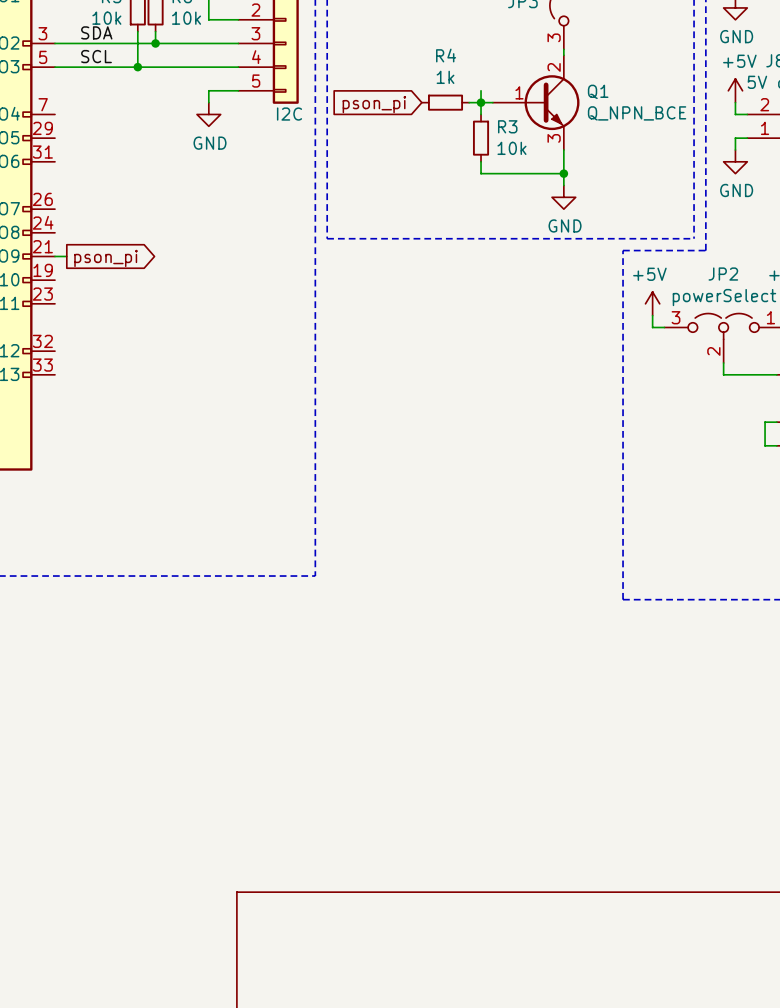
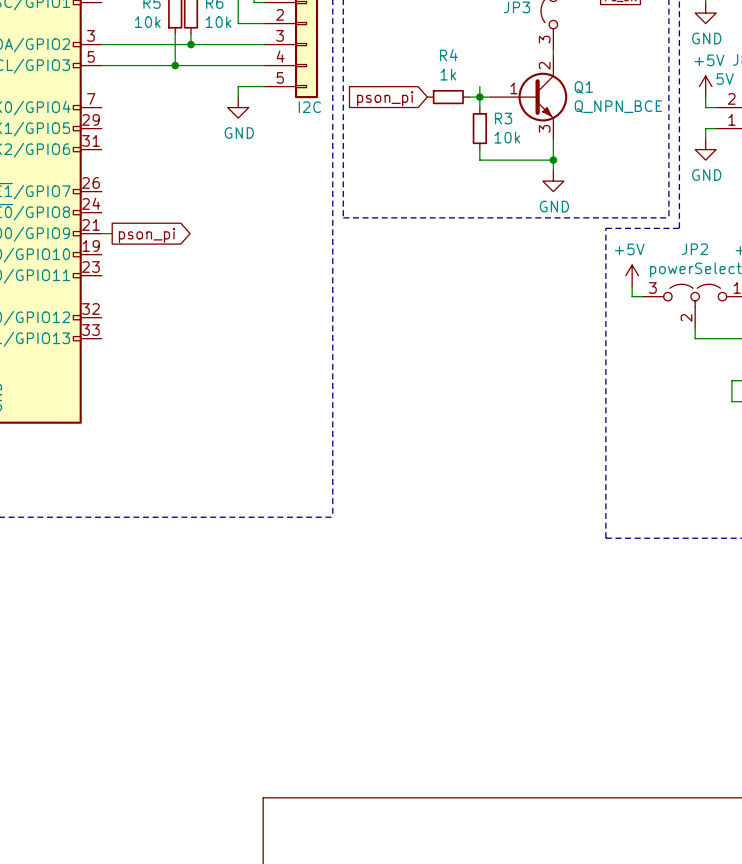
label: SDA (96, 32) -> none
label: SCL (96, 56) -> none

